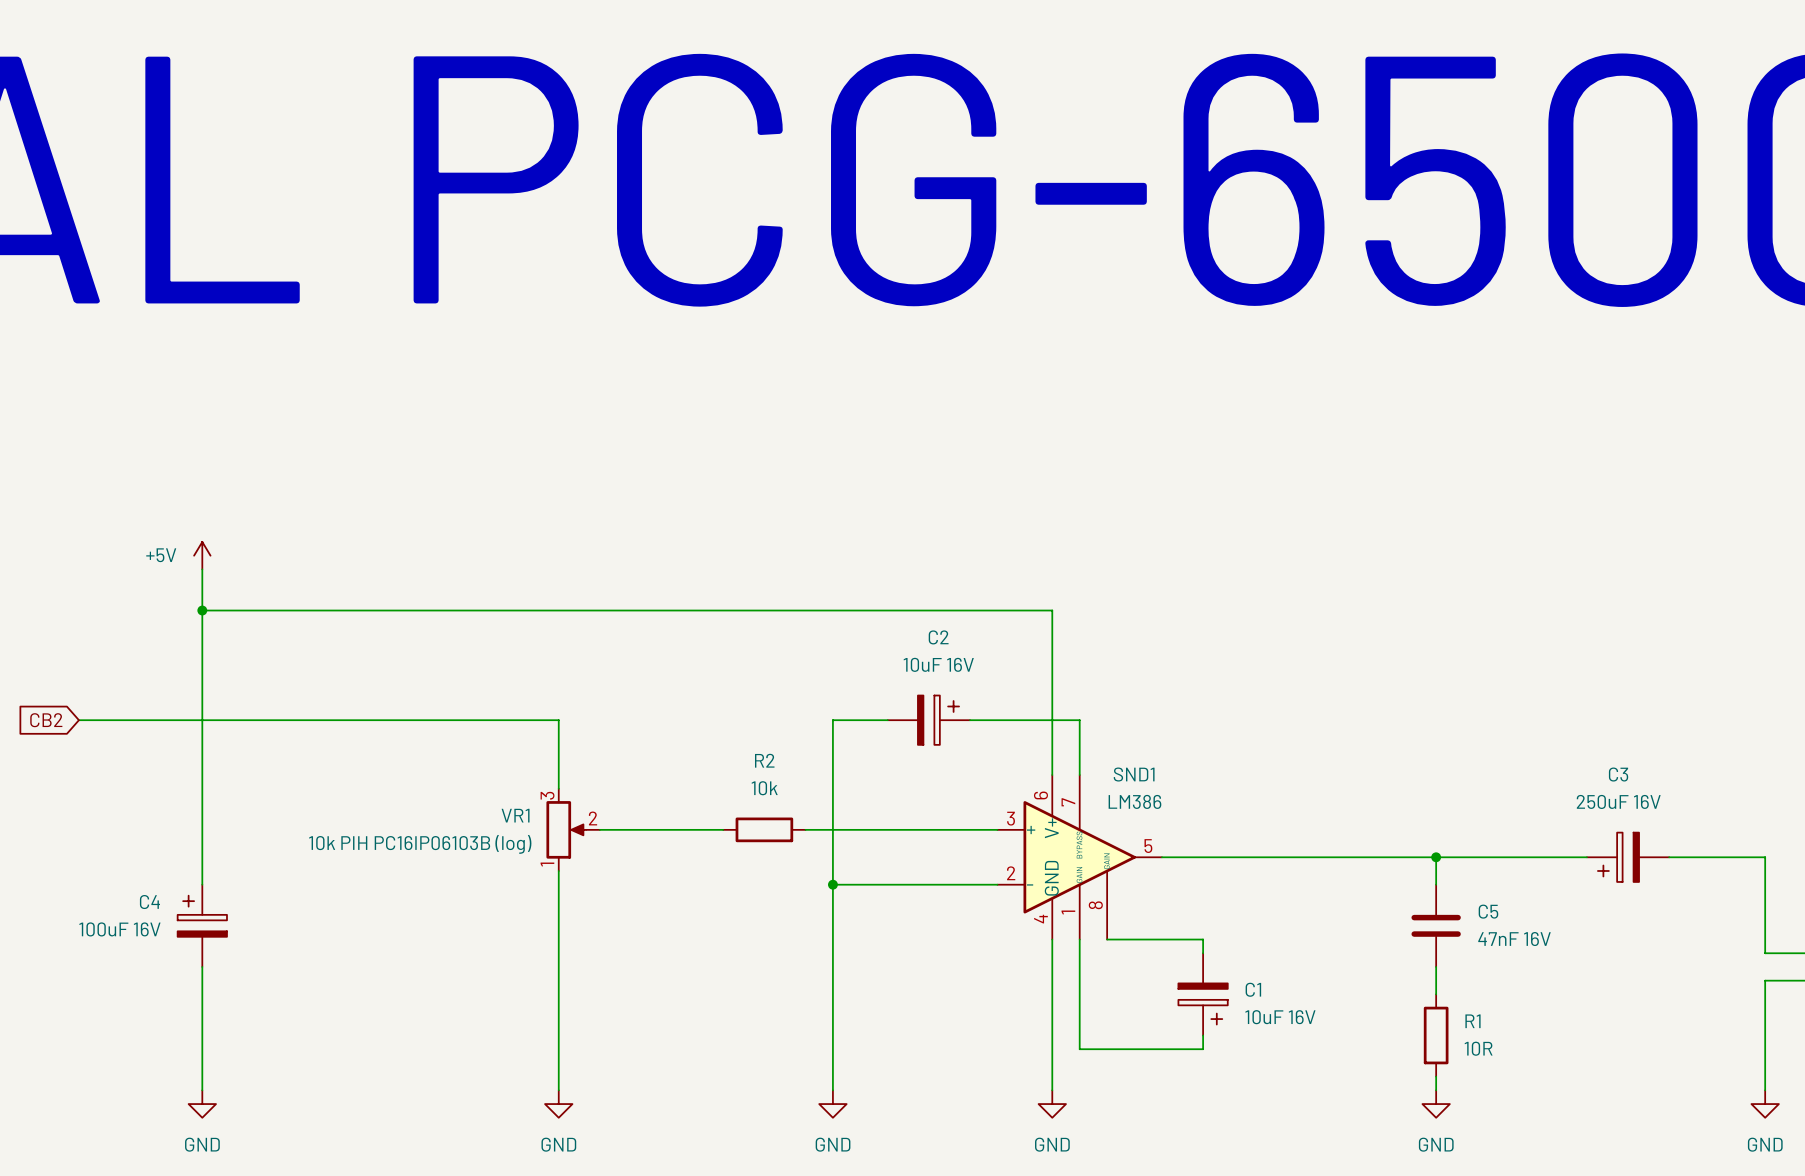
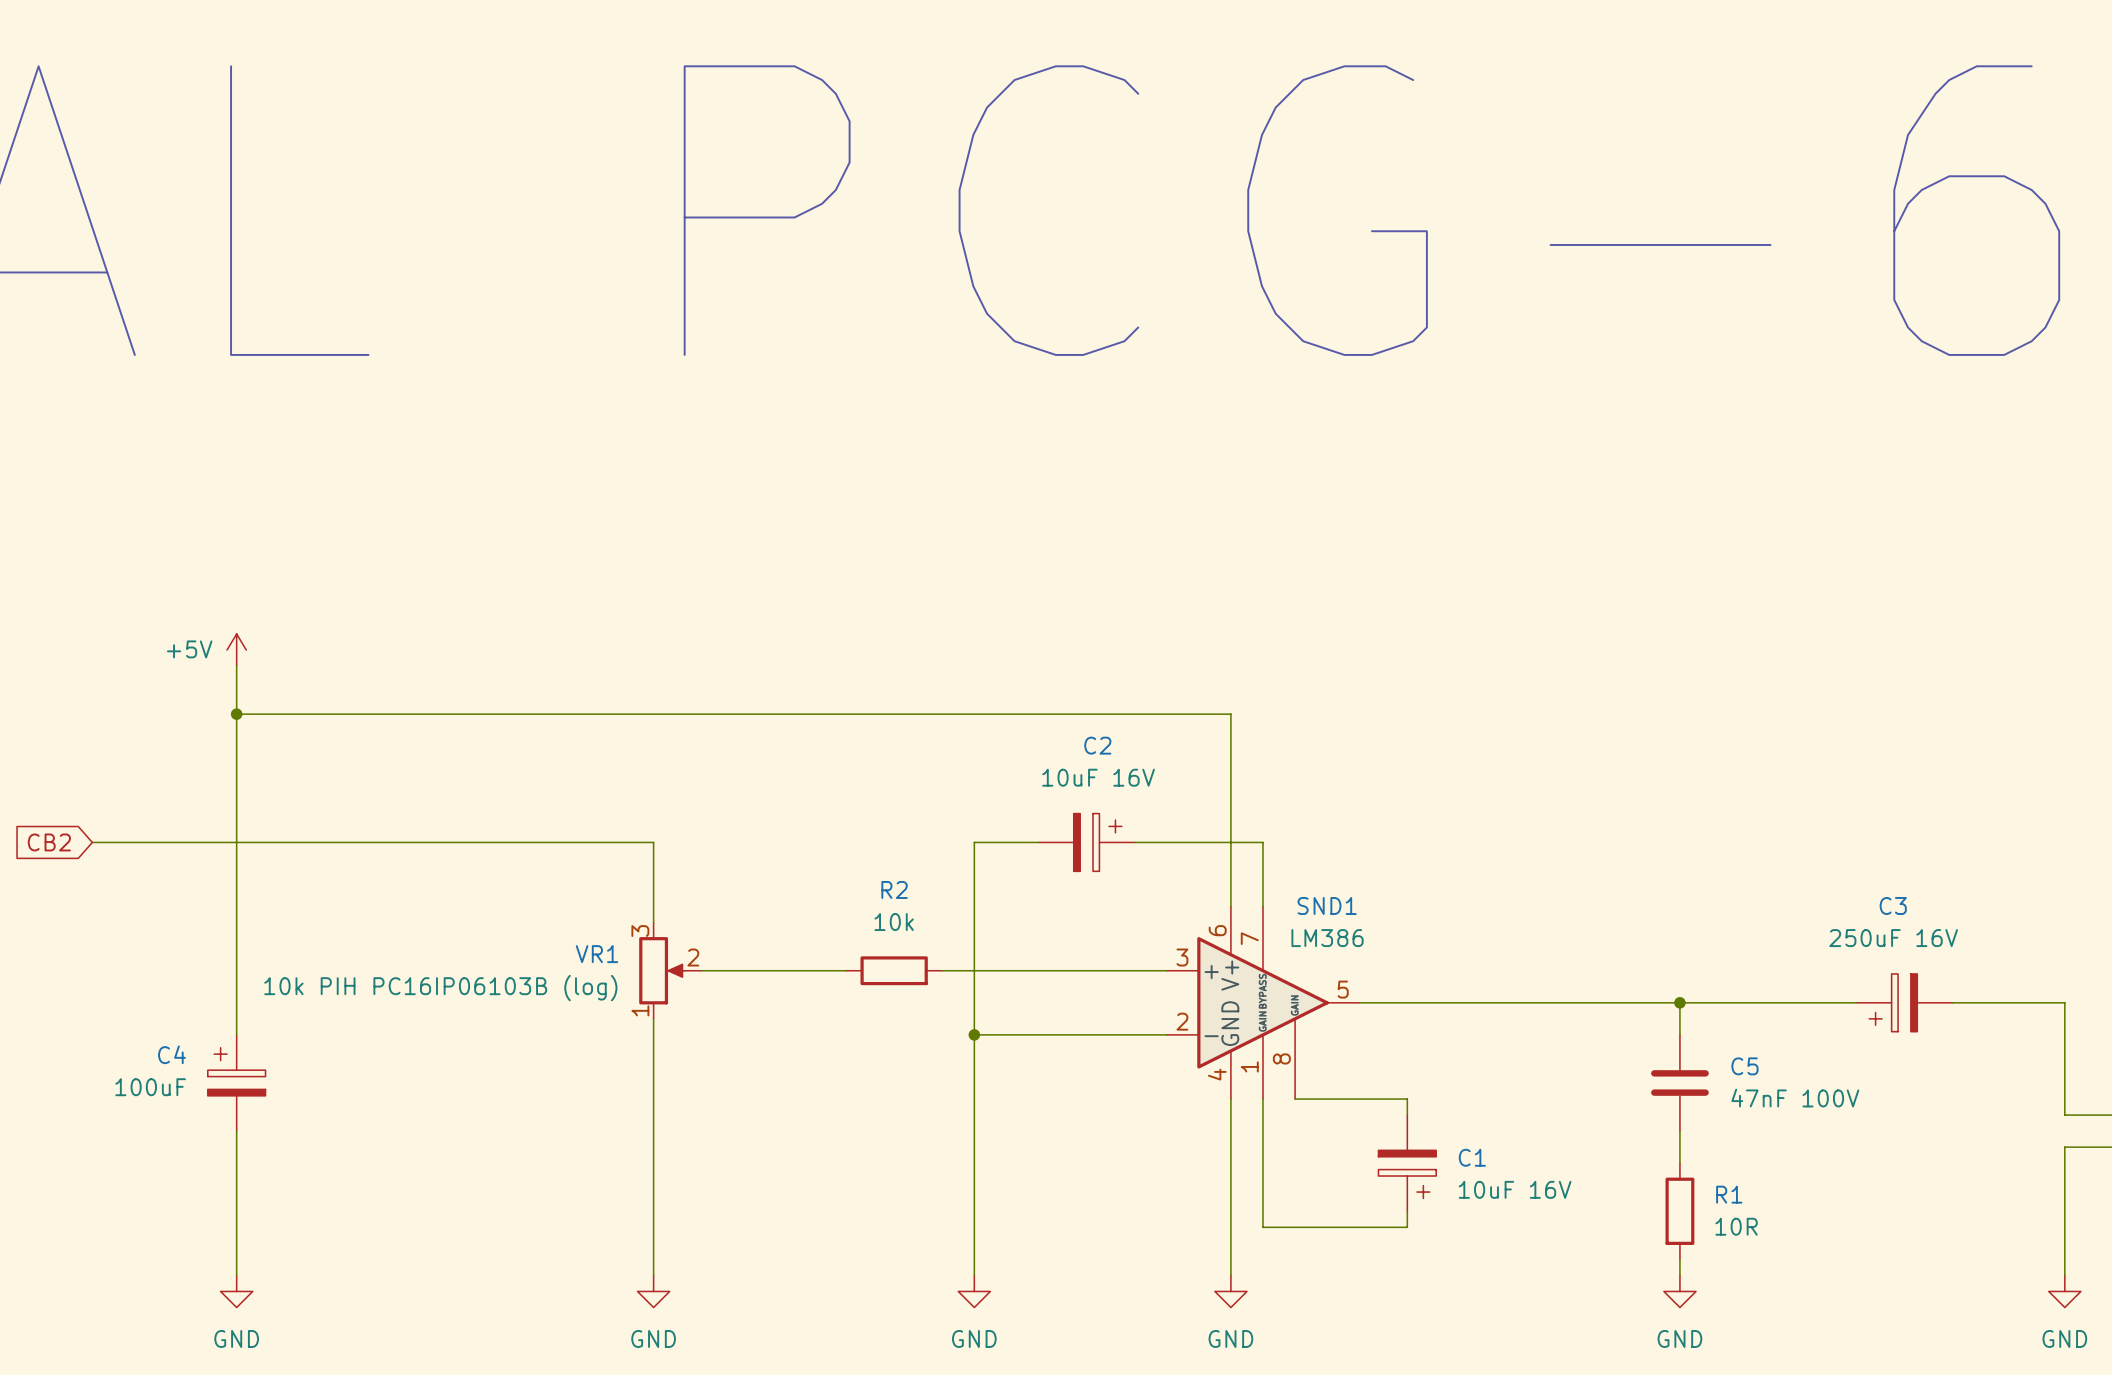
C4 value: 100uF 16V (119, 929) -> 100uF (150, 1087)
C5 value: 47nF 16V (1514, 939) -> 47nF 100V (1795, 1098)

